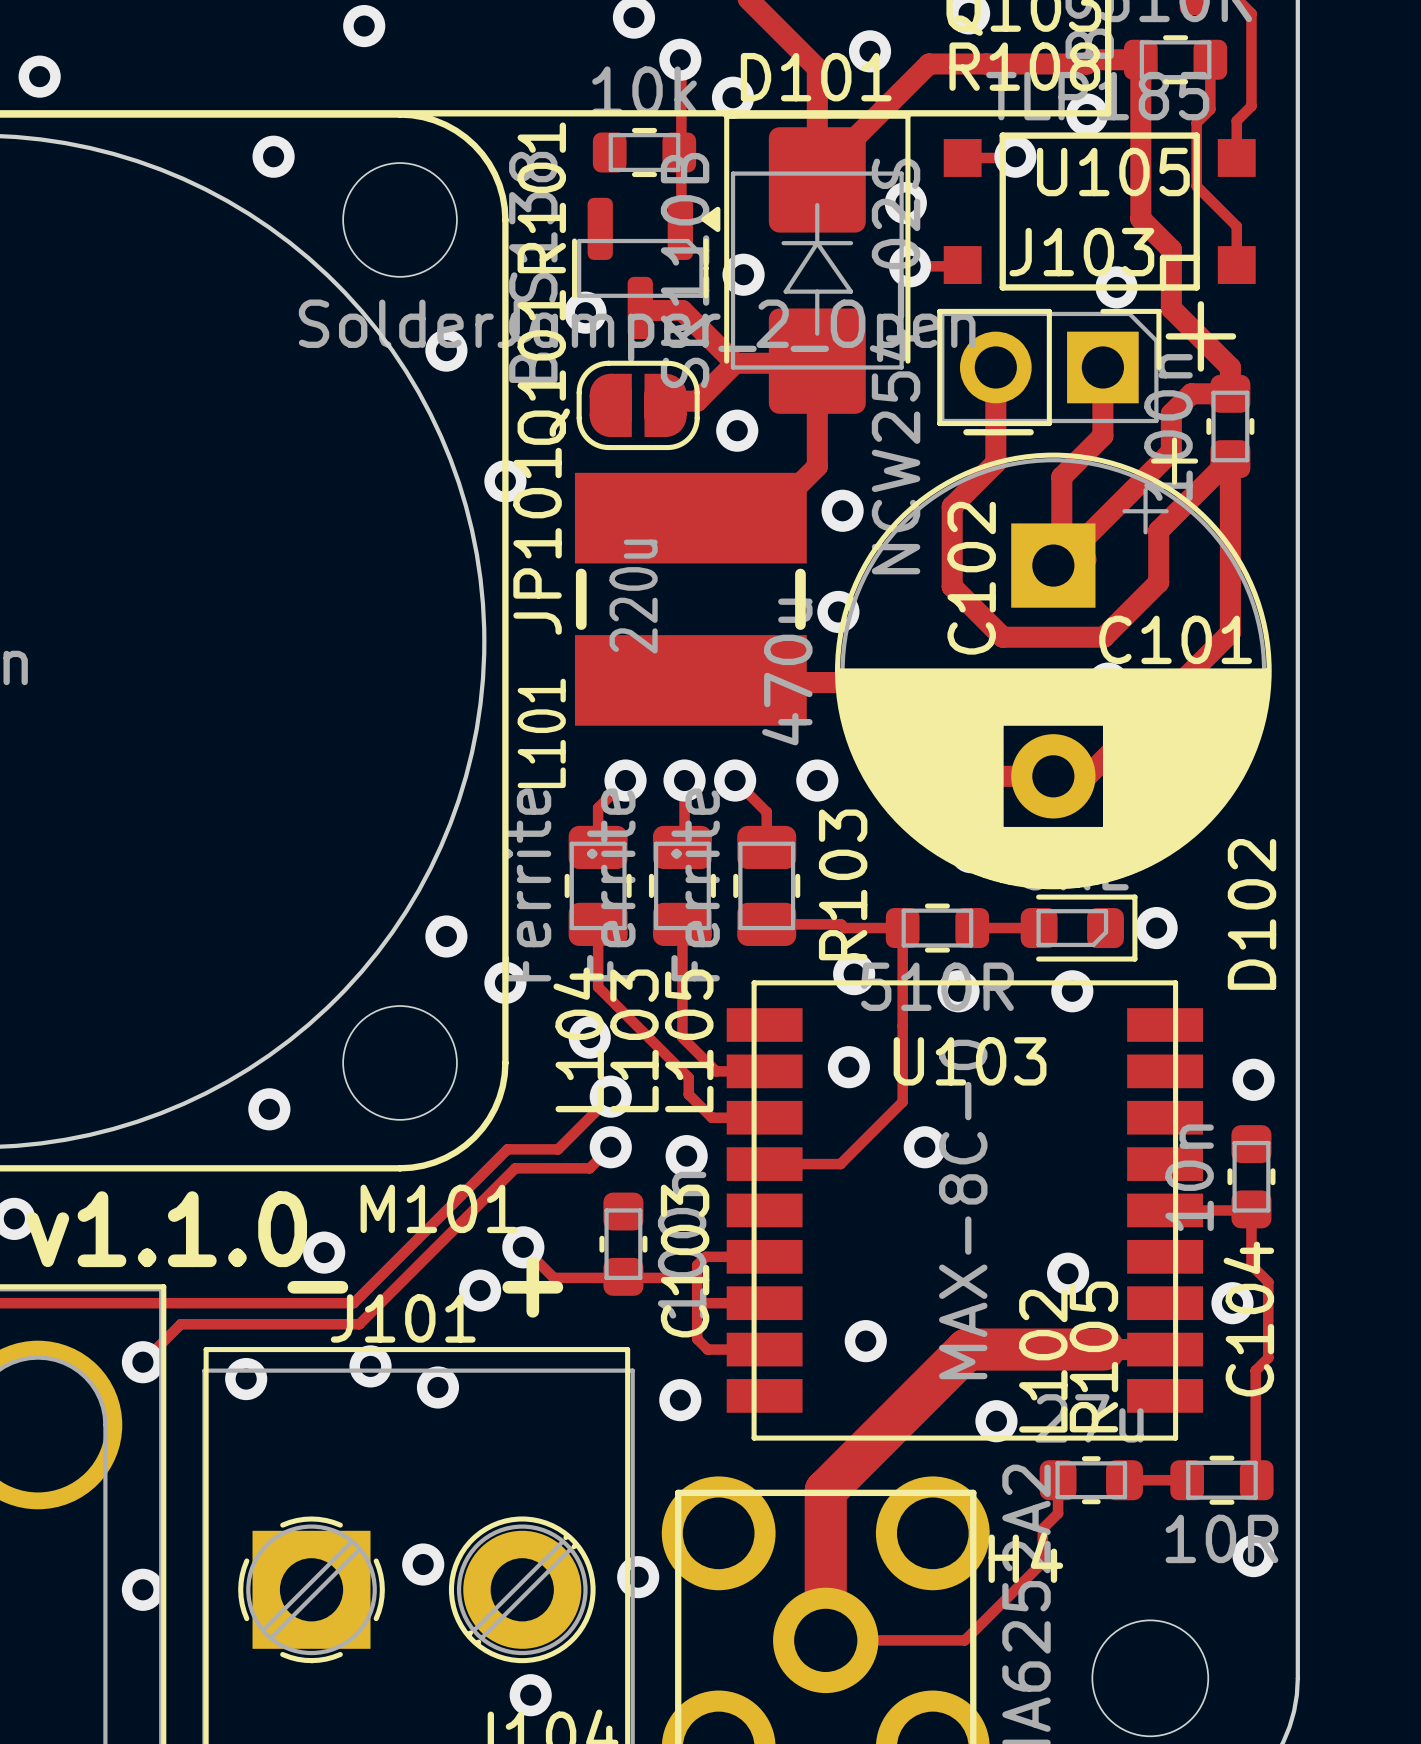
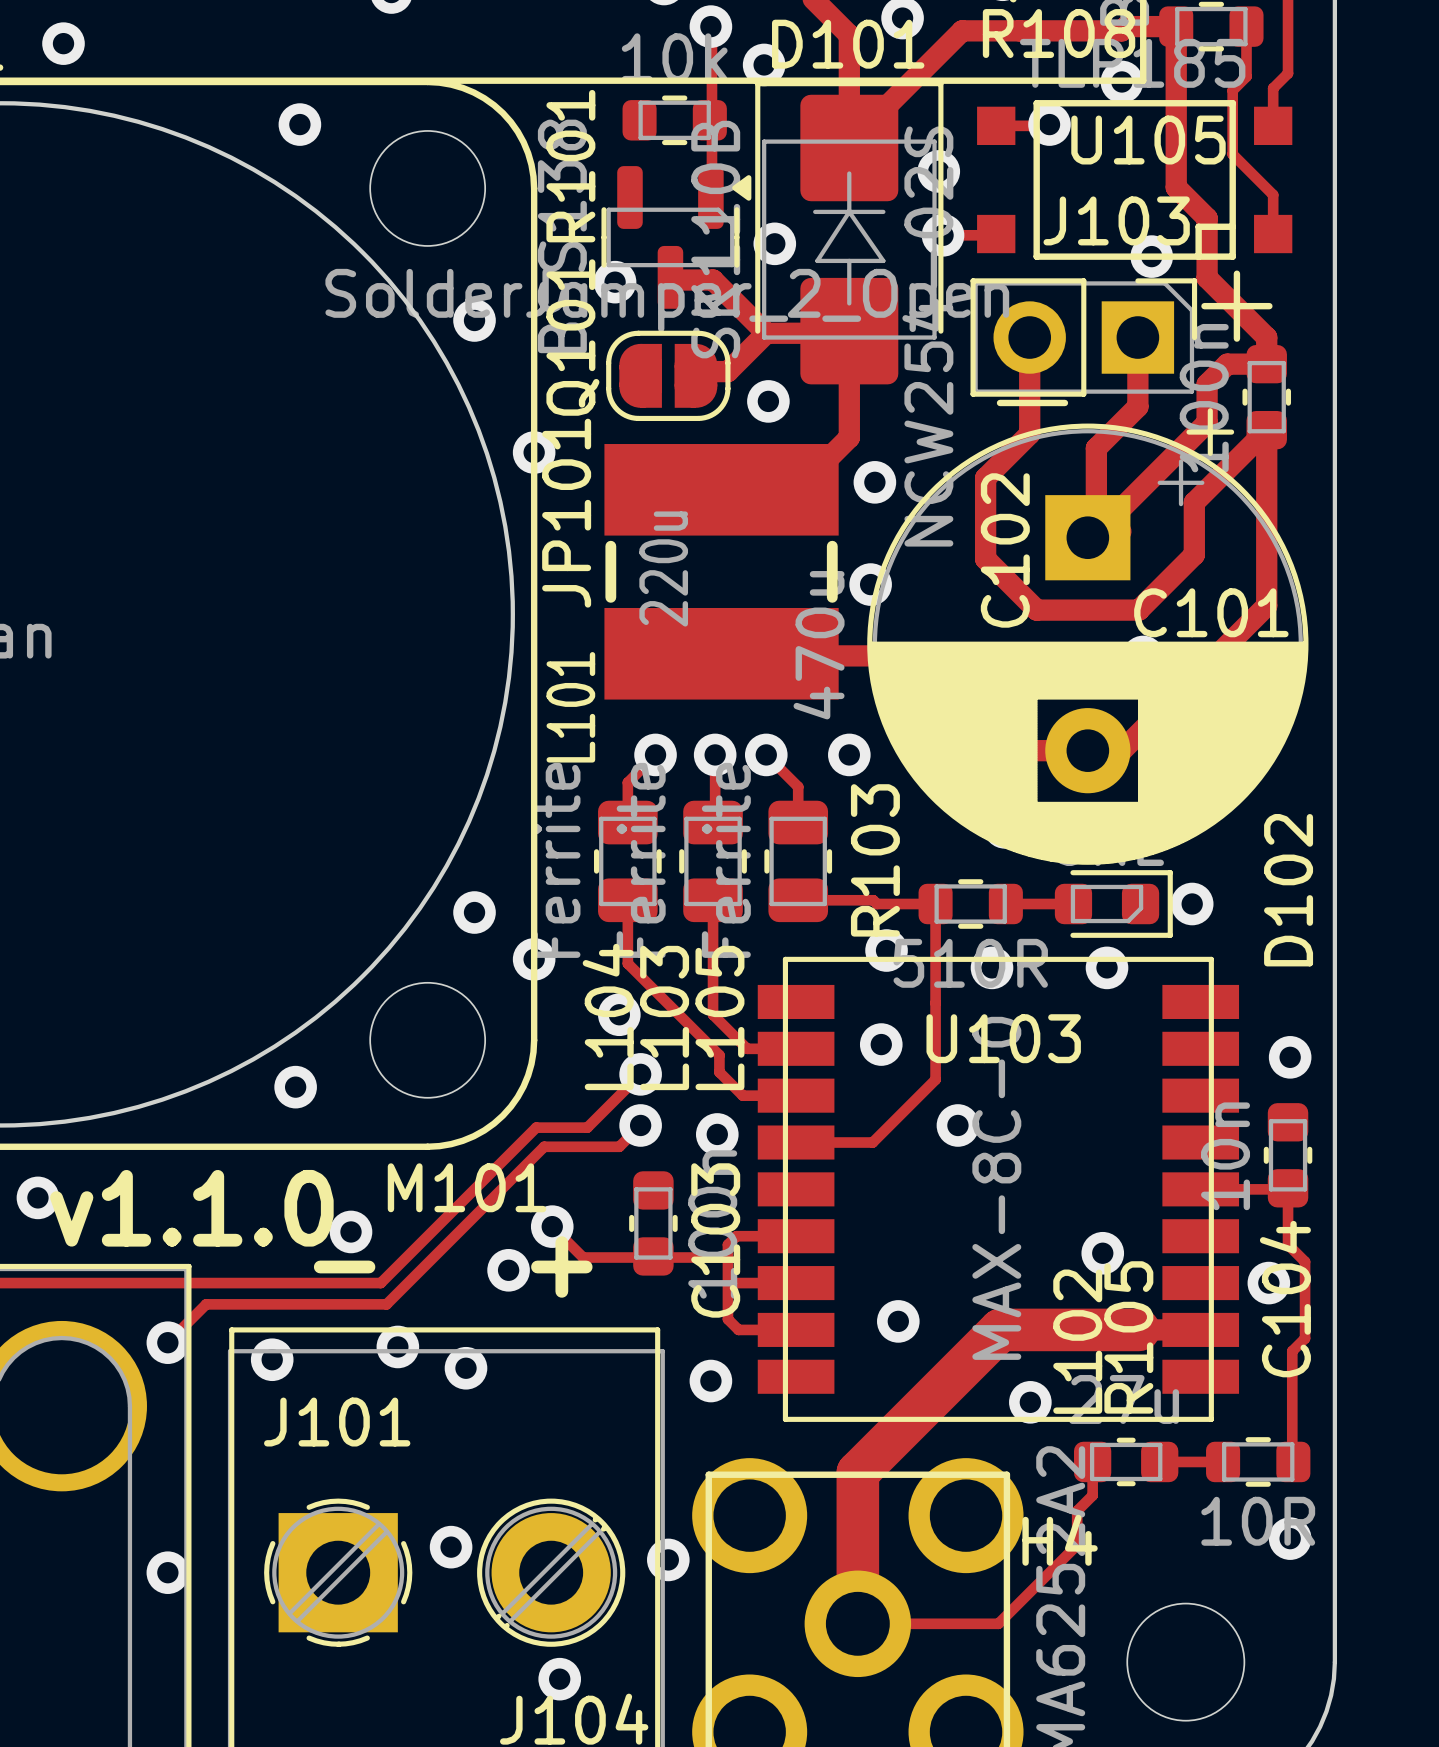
J101 name position: J101 (403, 1318) -> J101 (337, 1422)

